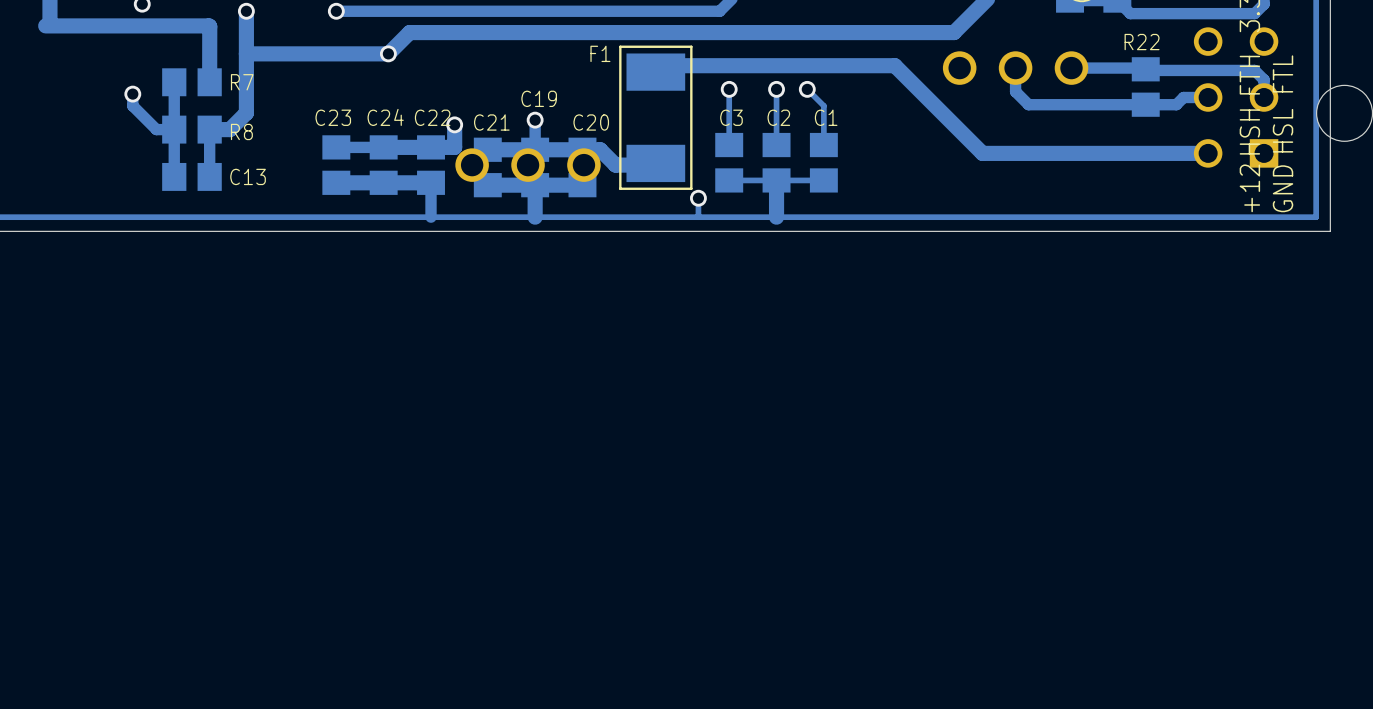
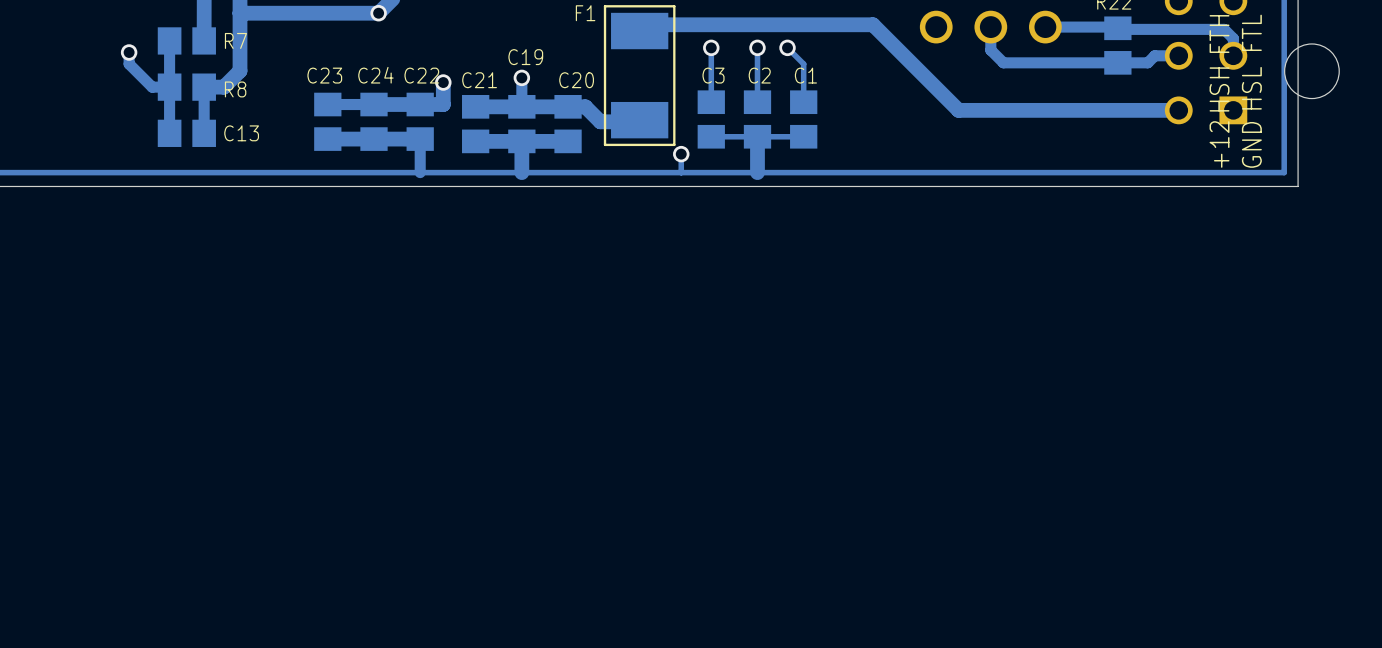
part: (528, 165) -> none

